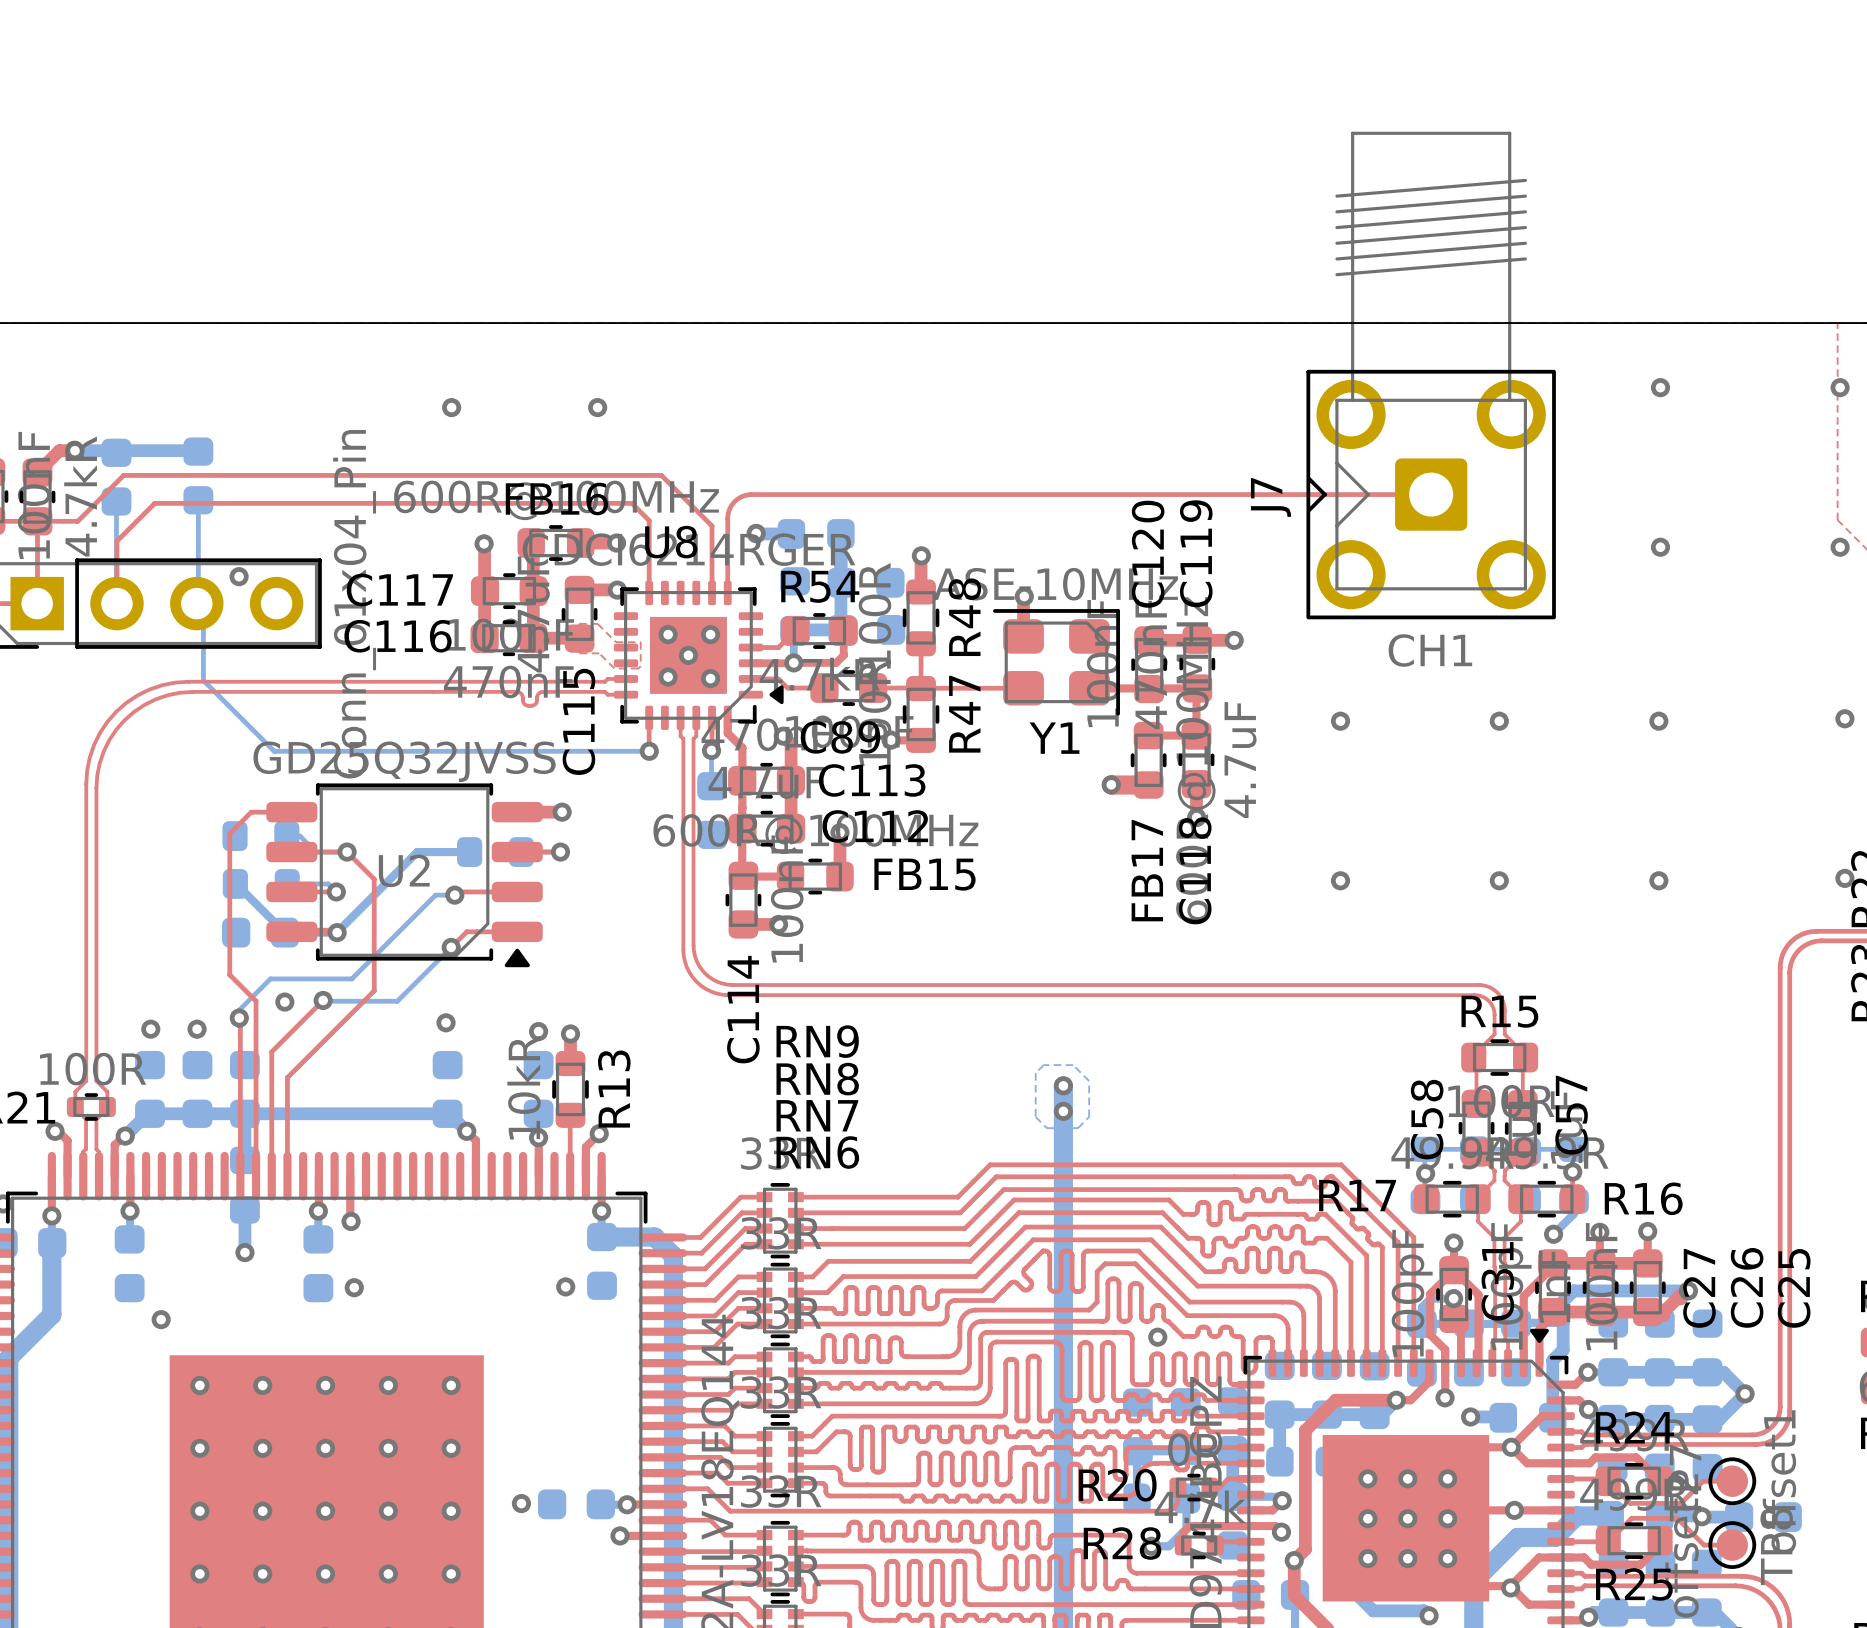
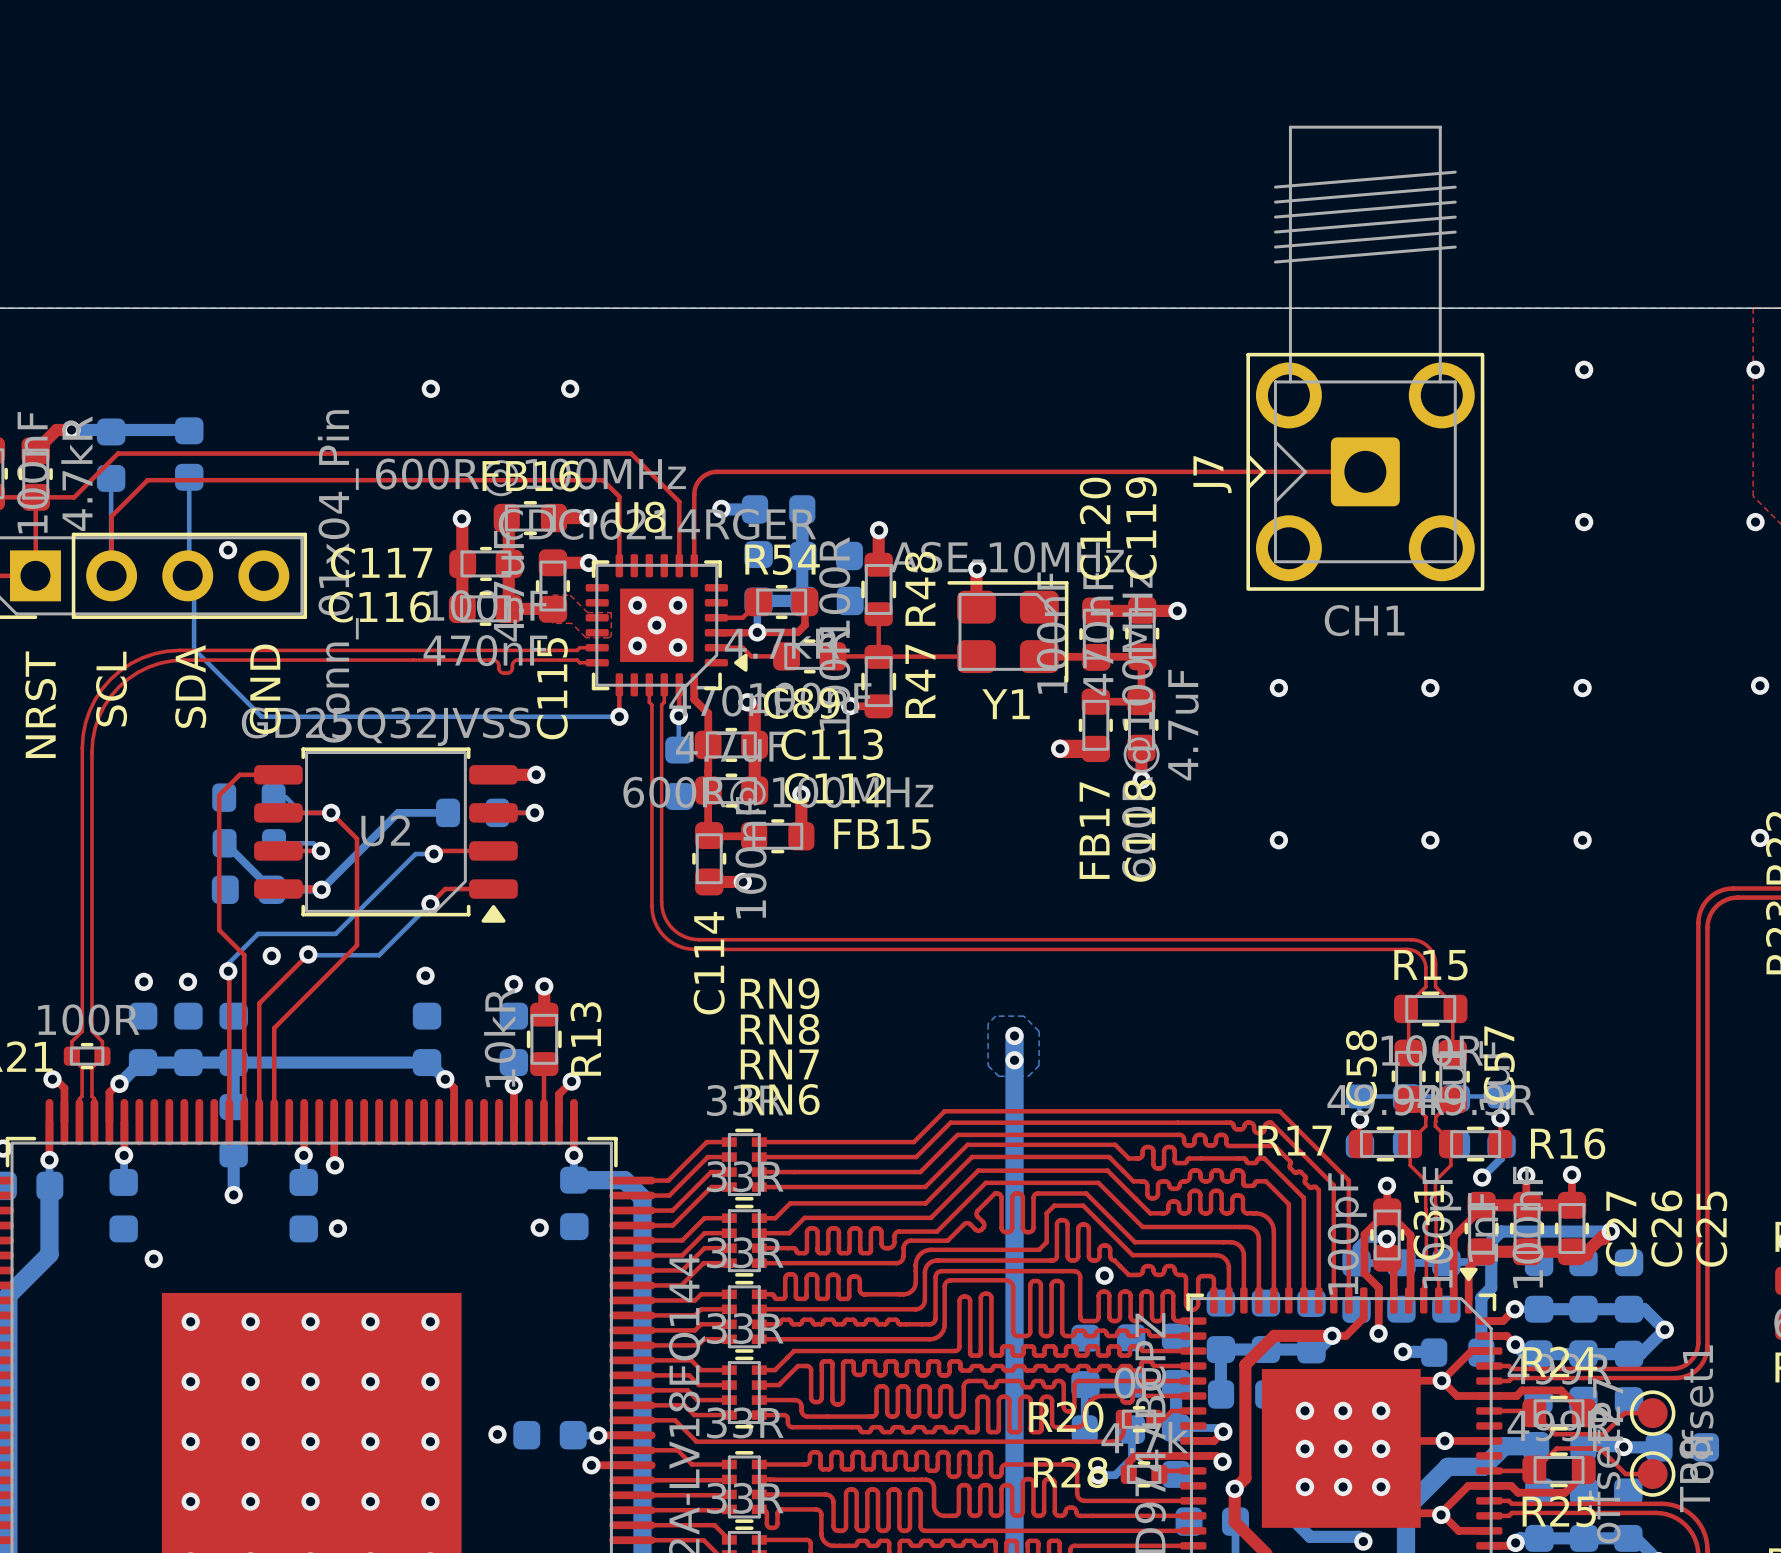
text: none -> SDA (190, 686)
text: none -> SCL (111, 689)
text: none -> GND (265, 689)
text: none -> NRST (40, 704)

